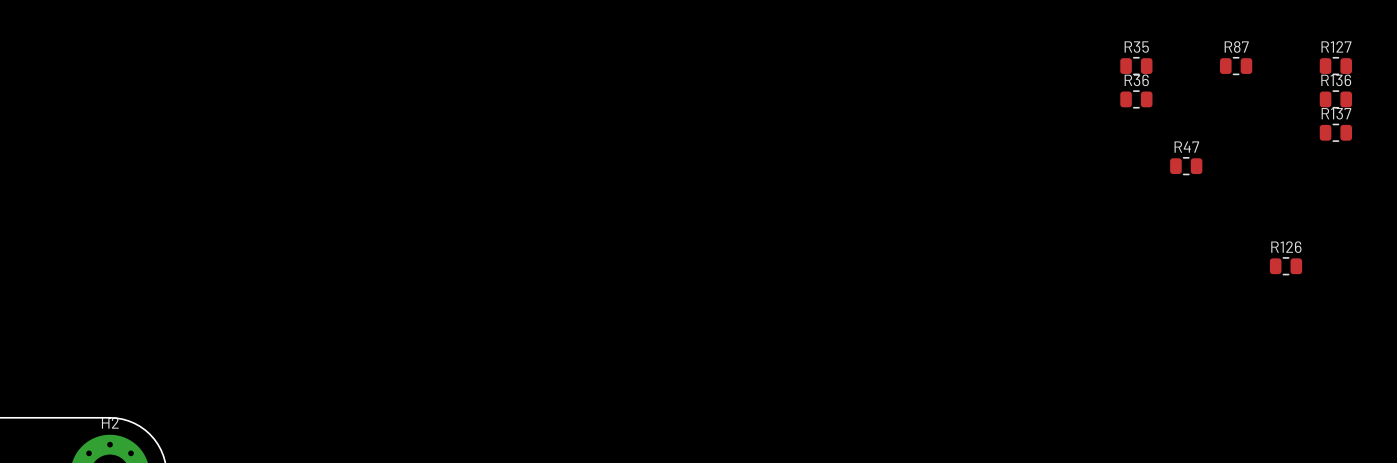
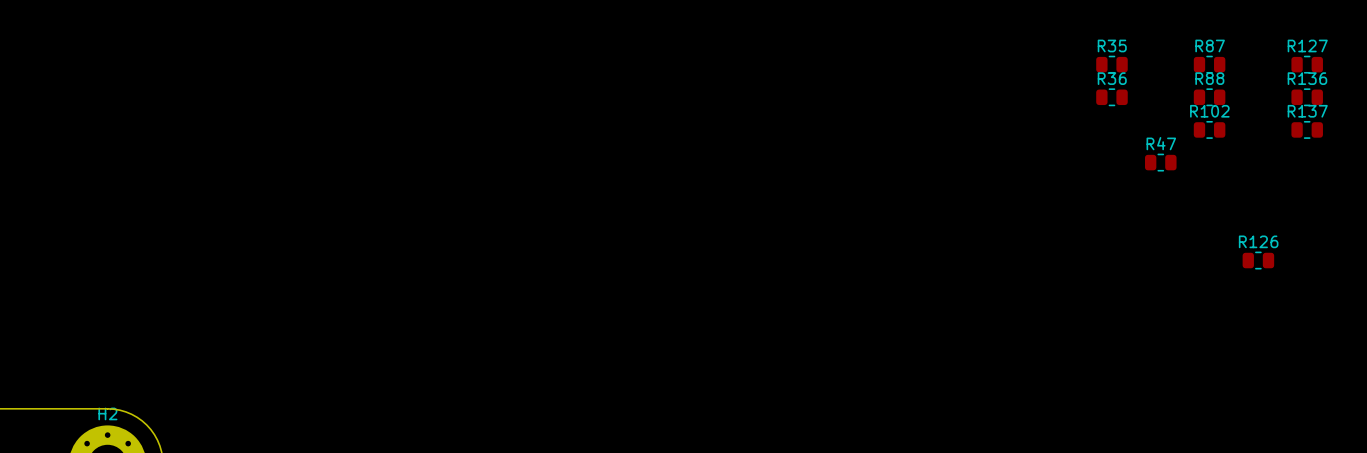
R88: none -> (1209, 97)
R102: none -> (1209, 129)

